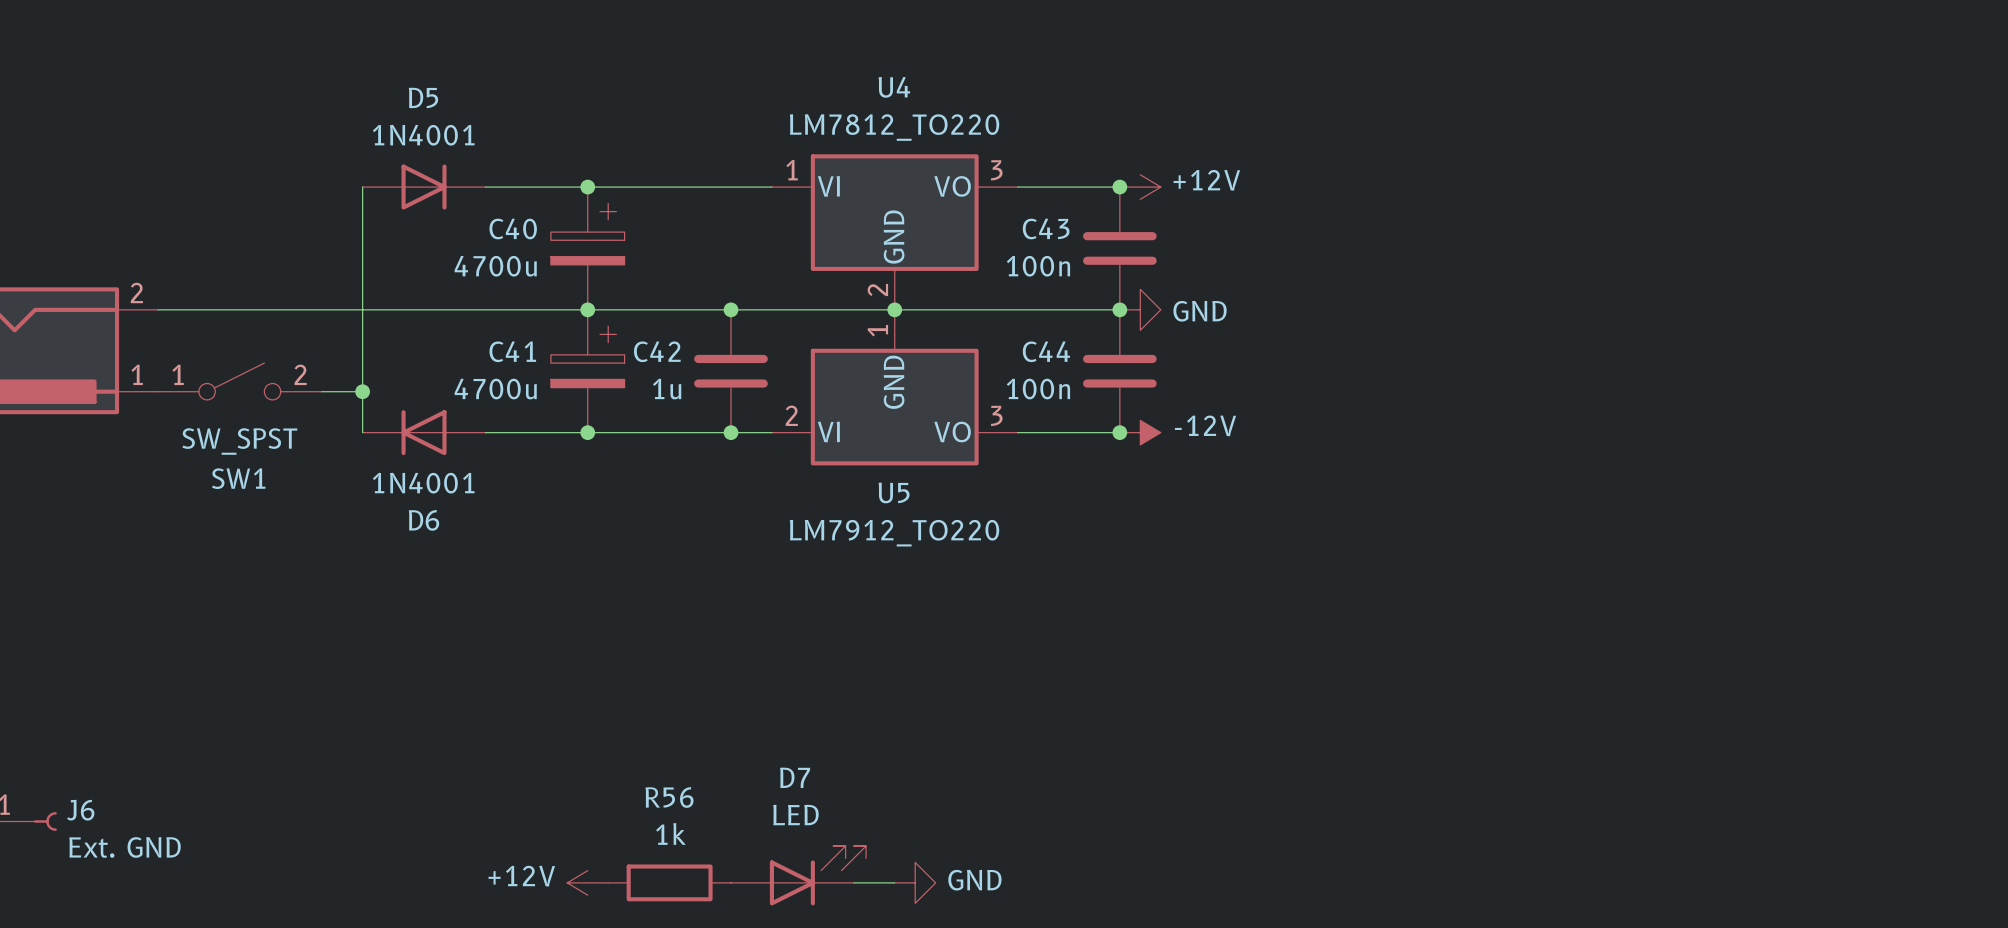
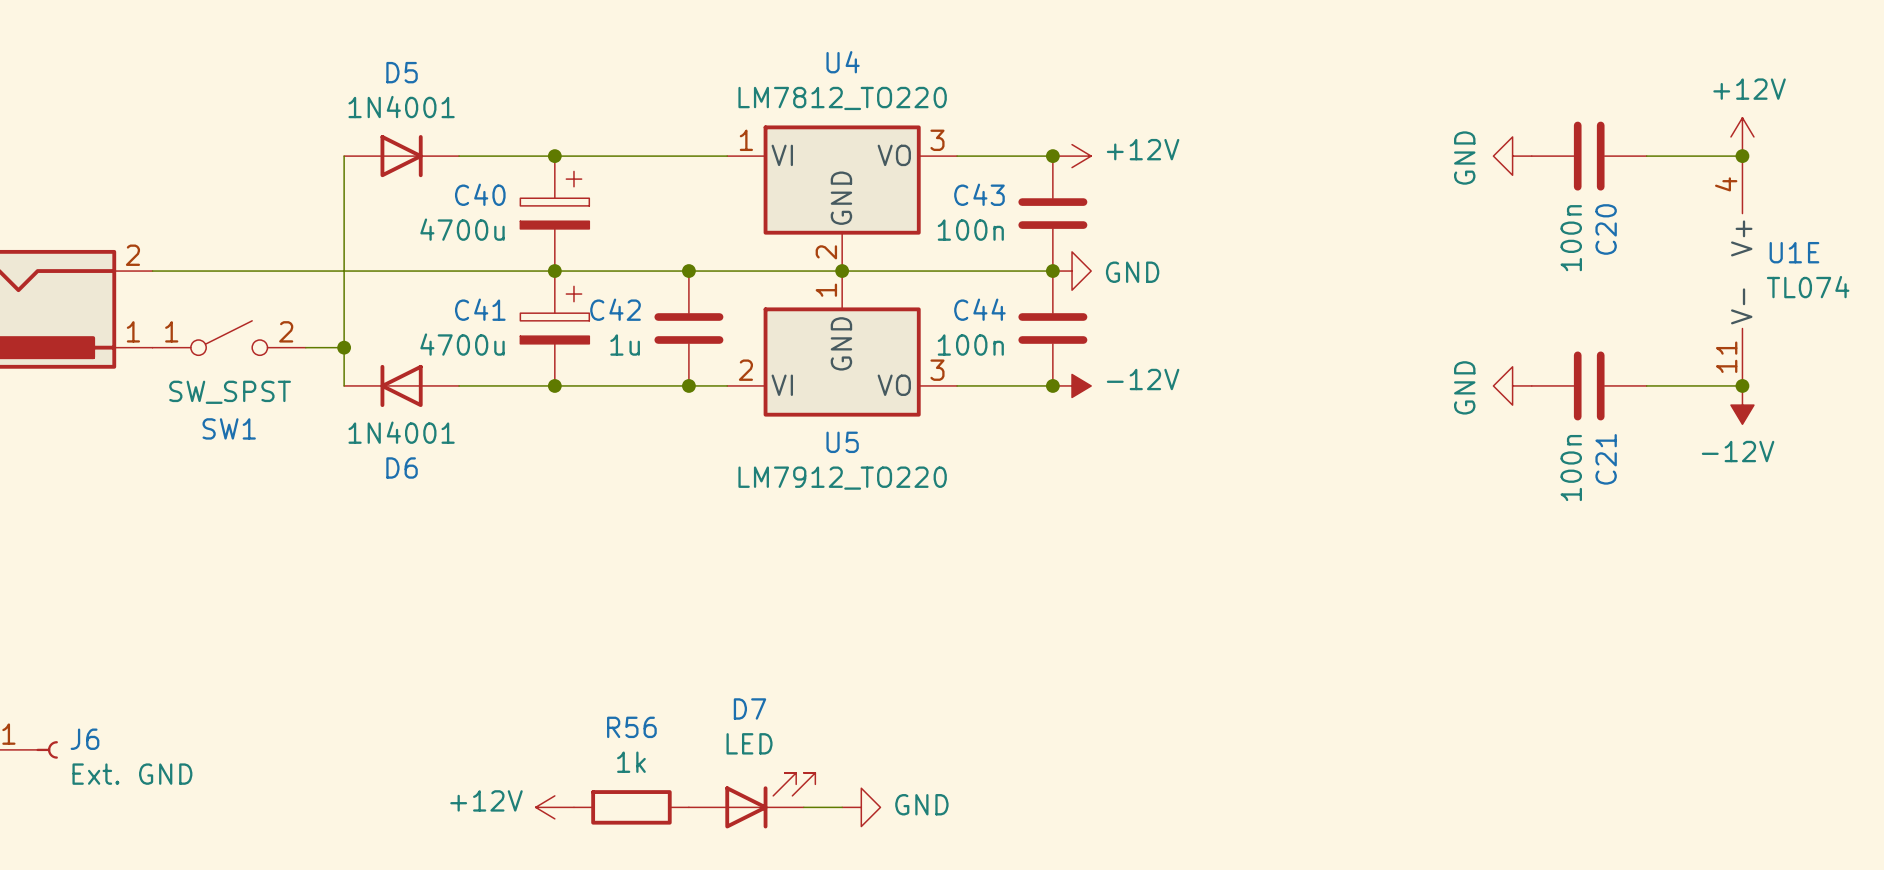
power symbol: none -> +12V (1742, 136)
power symbol: none -> GND (1512, 156)
C20: none -> 100n (1589, 156)
wire: none -> (1646, 156) (1742, 156)
junction: none -> (1742, 156)
U1E: none -> TL074 (1742, 271)
power symbol: none -> GND (1512, 385)
C21: none -> 100n (1589, 385)
wire: none -> (1646, 385) (1742, 385)
junction: none -> (1742, 385)
power symbol: none -> -12V (1742, 405)

